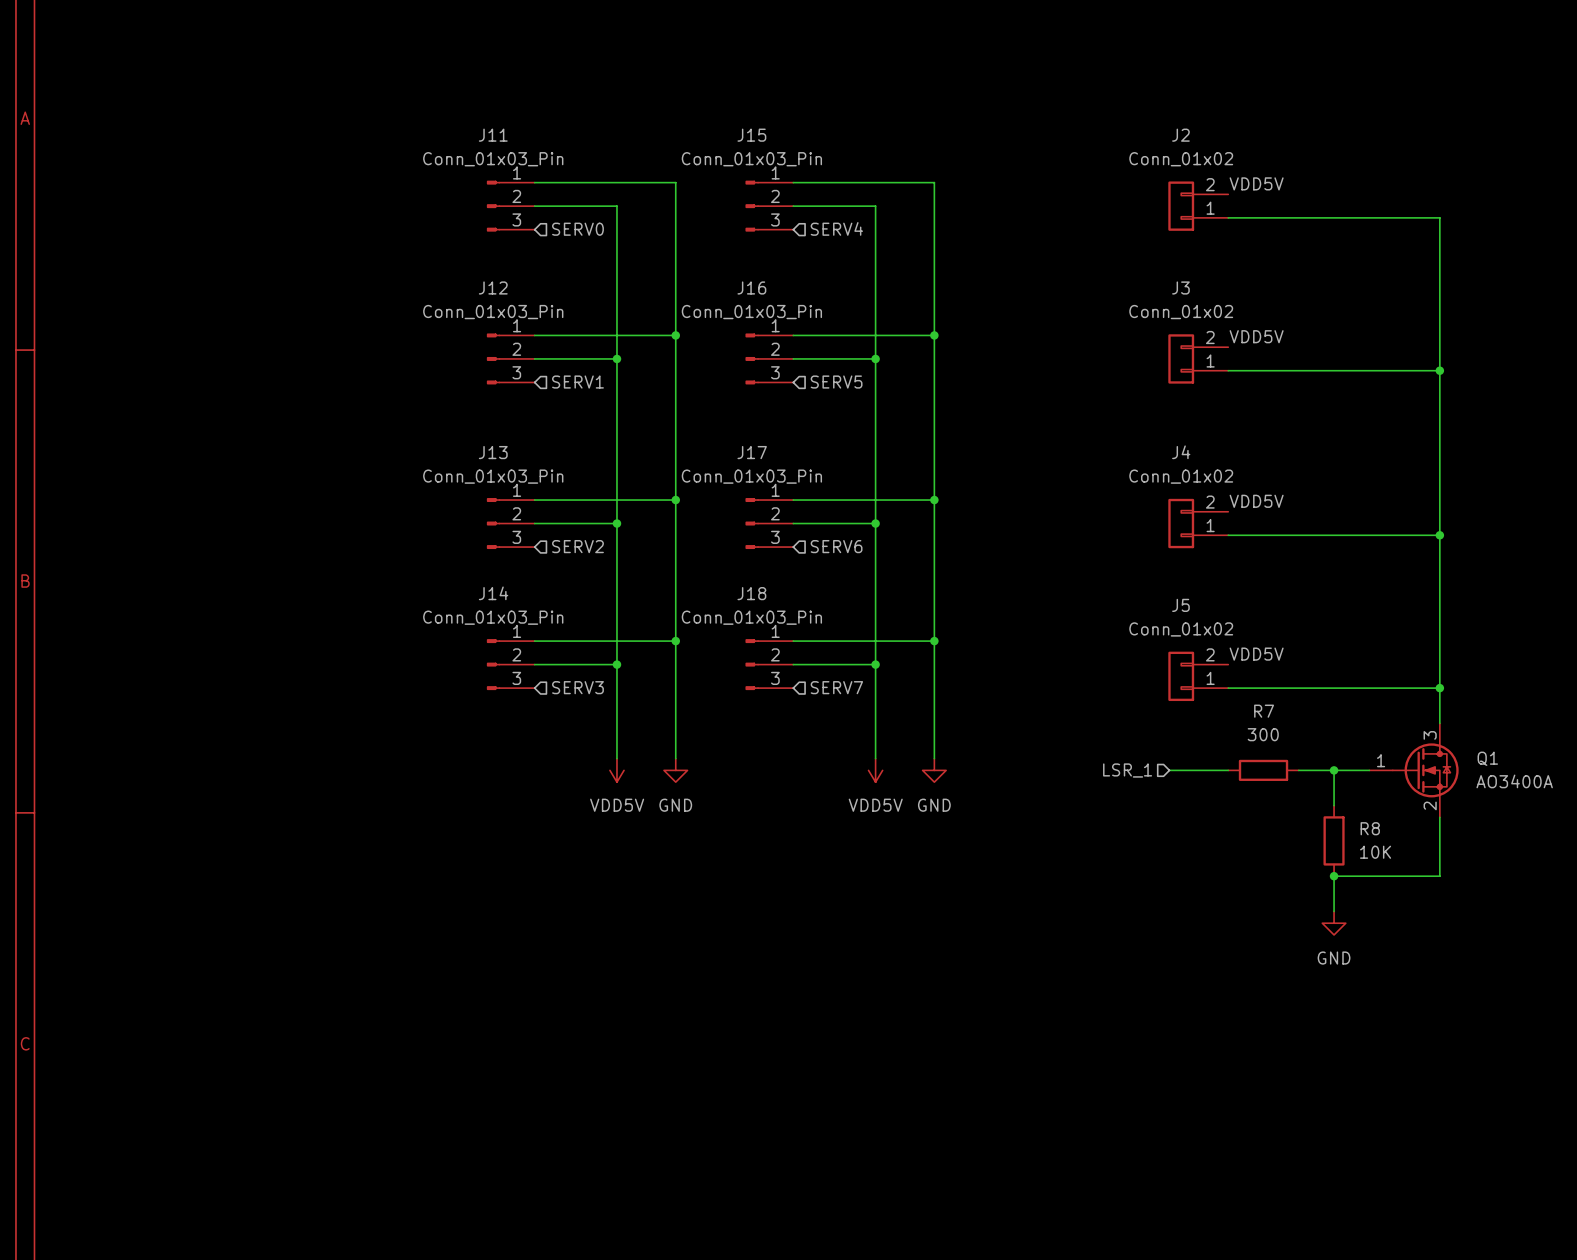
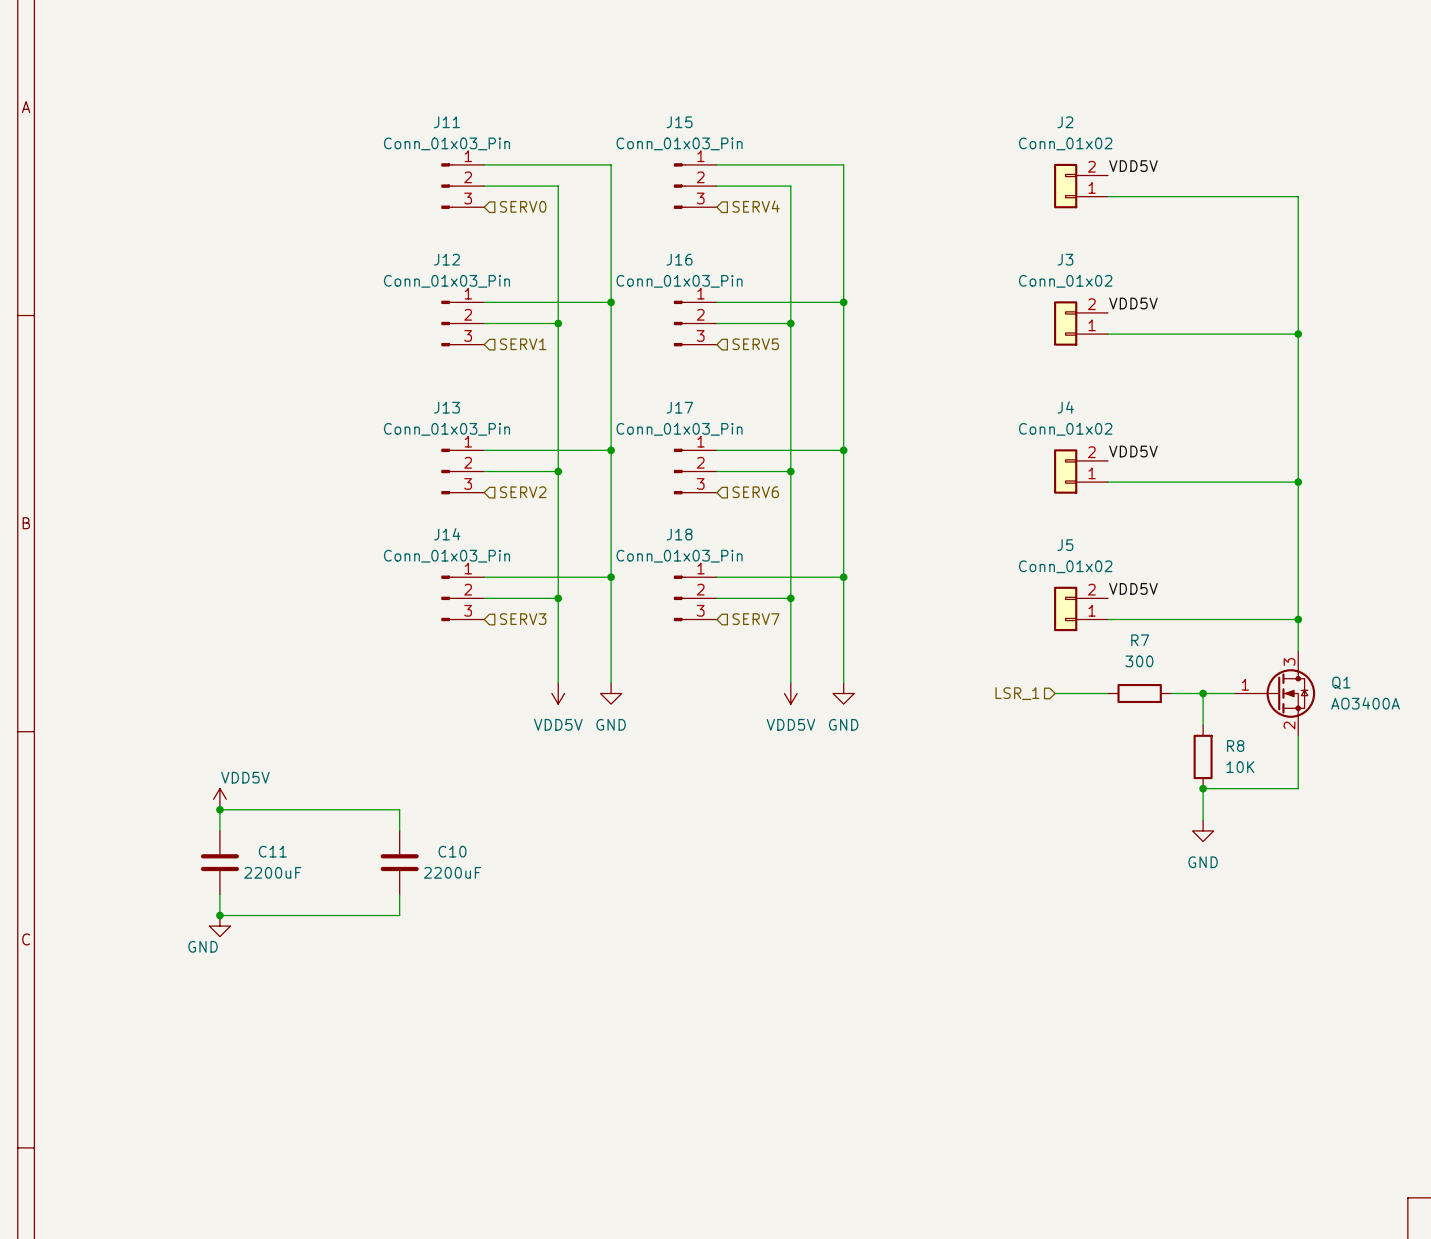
power symbol: none -> VDD5V (219, 799)
junction: none -> (219, 809)
wire: none -> (219, 830) (219, 809) (399, 809) (399, 830)
C11: none -> 2200uF (219, 862)
C10: none -> 2200uF (399, 862)
wire: none -> (219, 894) (219, 915) (399, 915) (399, 894)
junction: none -> (219, 915)
power symbol: none -> GND (219, 926)

